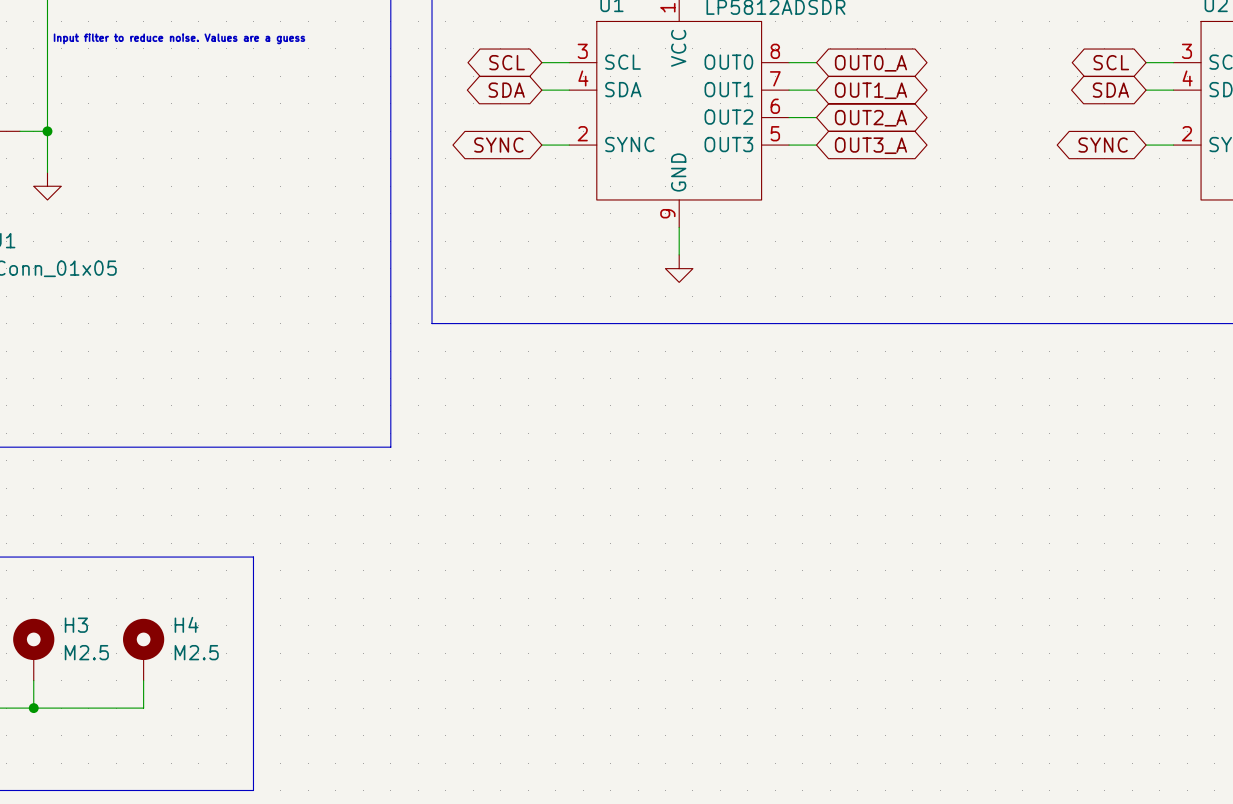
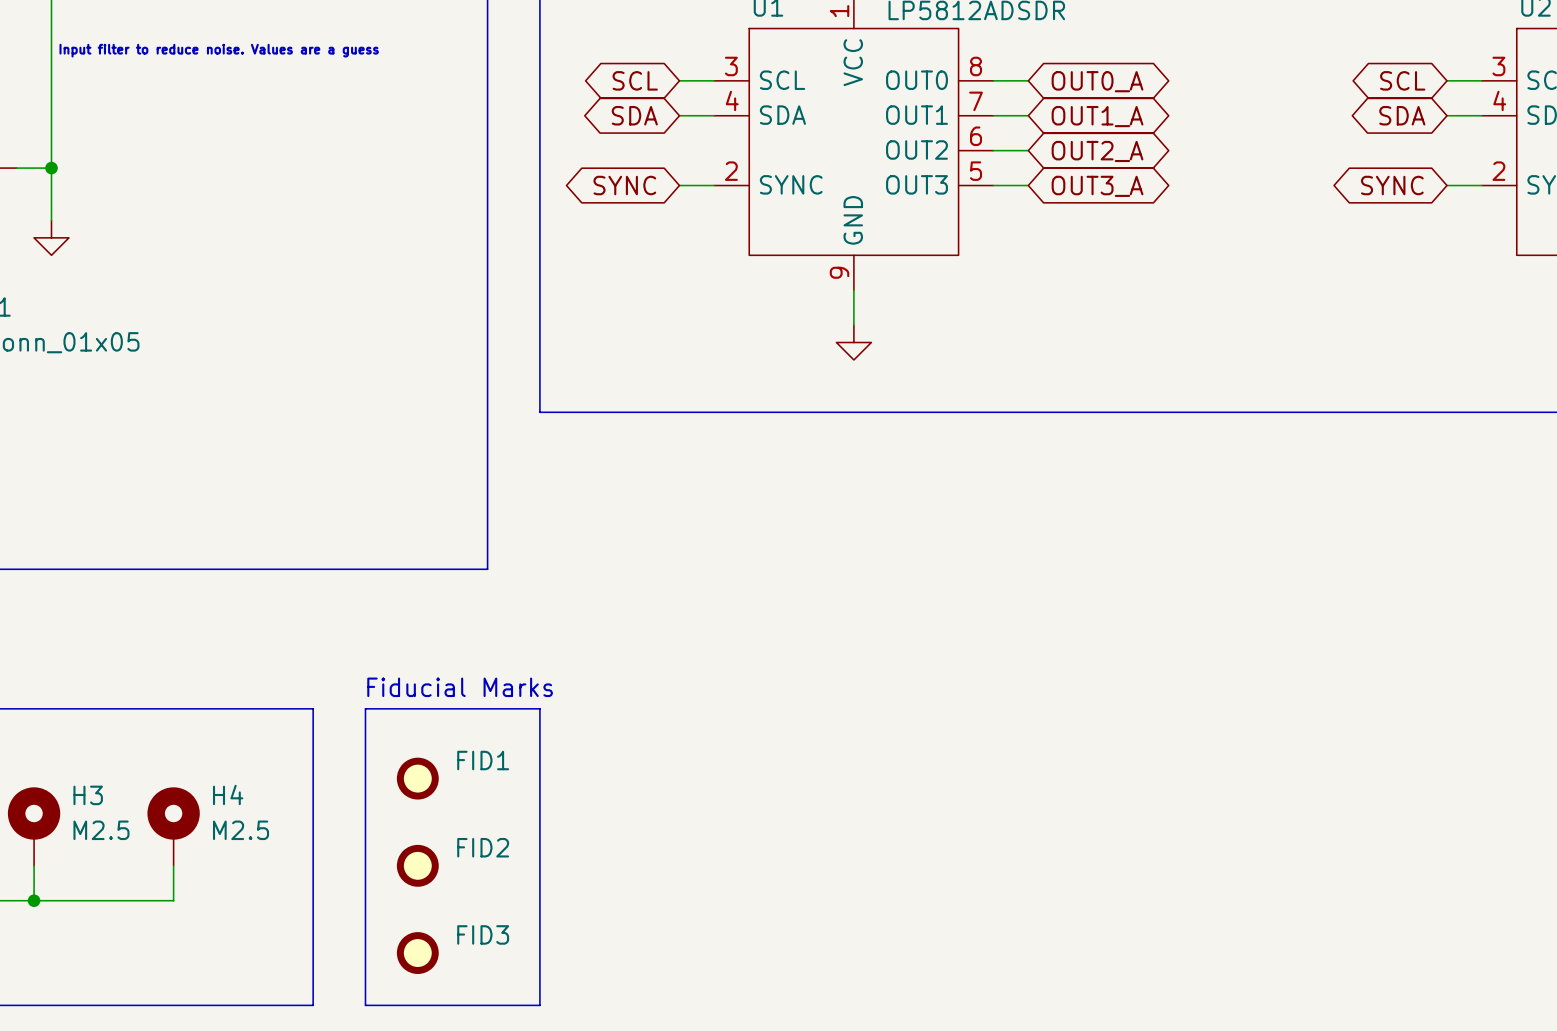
text: none -> Fiducial Marks (460, 687)
line: none -> (365, 708) (539, 708) (539, 1005) (365, 1005) (365, 708)
FID1: none -> (417, 778)
FID2: none -> (417, 865)
FID3: none -> (417, 953)

